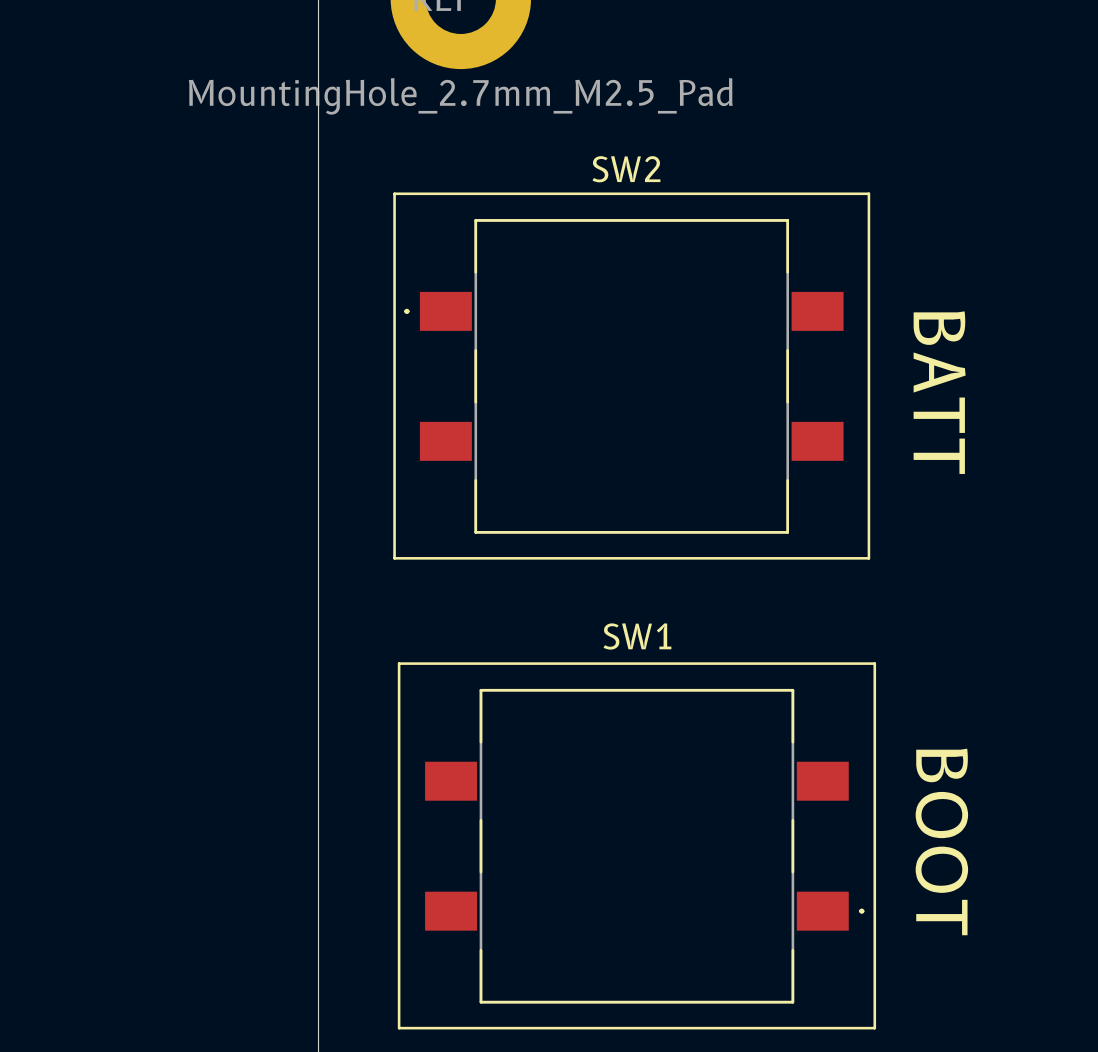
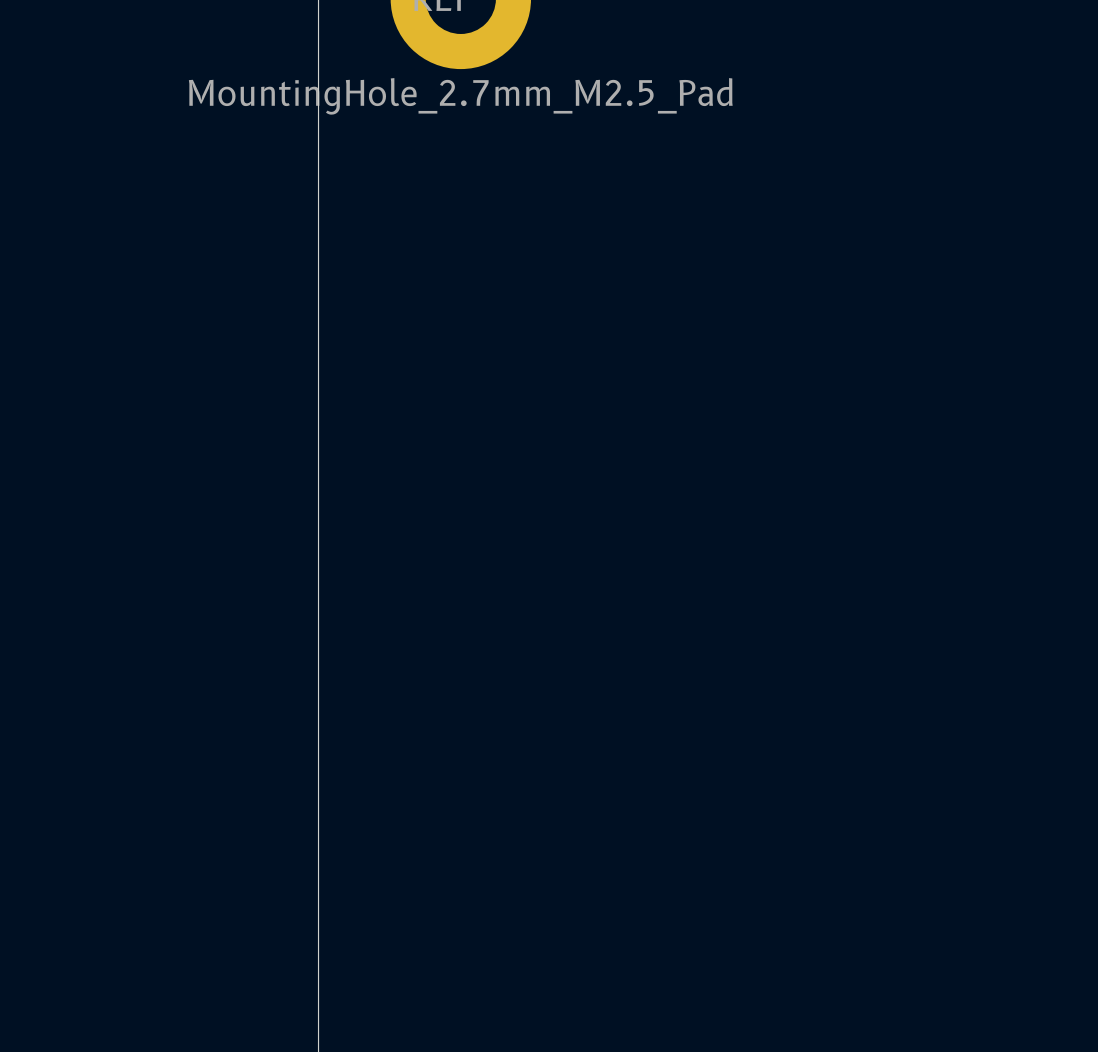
line: (394, 193) (868, 193) (868, 558) (394, 558) (394, 193) -> none
SW2: (623, 376) -> none
text: BATT (939, 392) -> none
line: (399, 663) (874, 663) (874, 1028) (399, 1028) (399, 663) -> none
text: BOOT (941, 841) -> none
SW1: (644, 846) -> none

